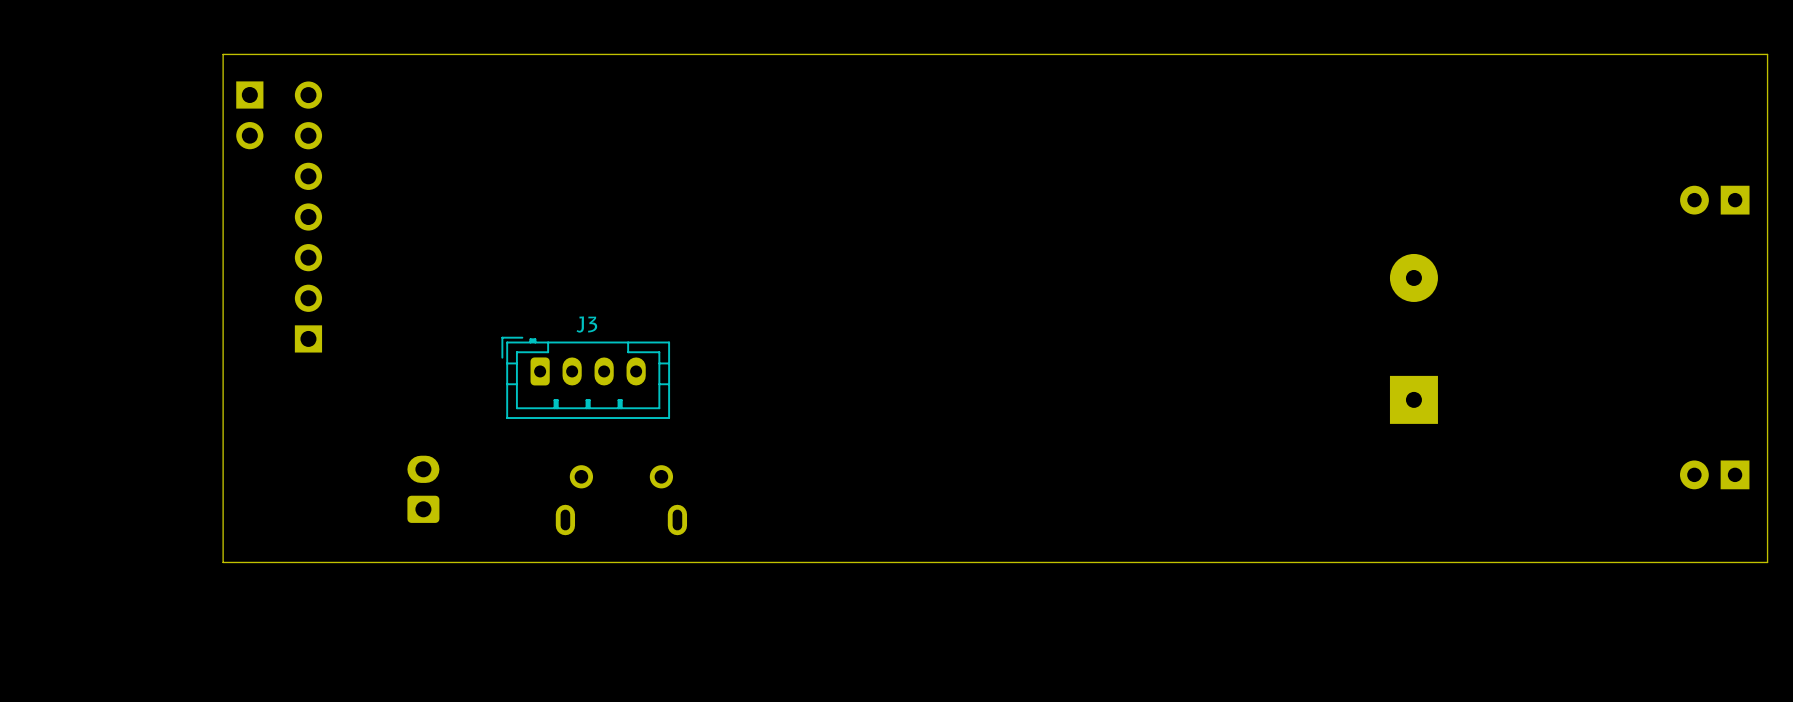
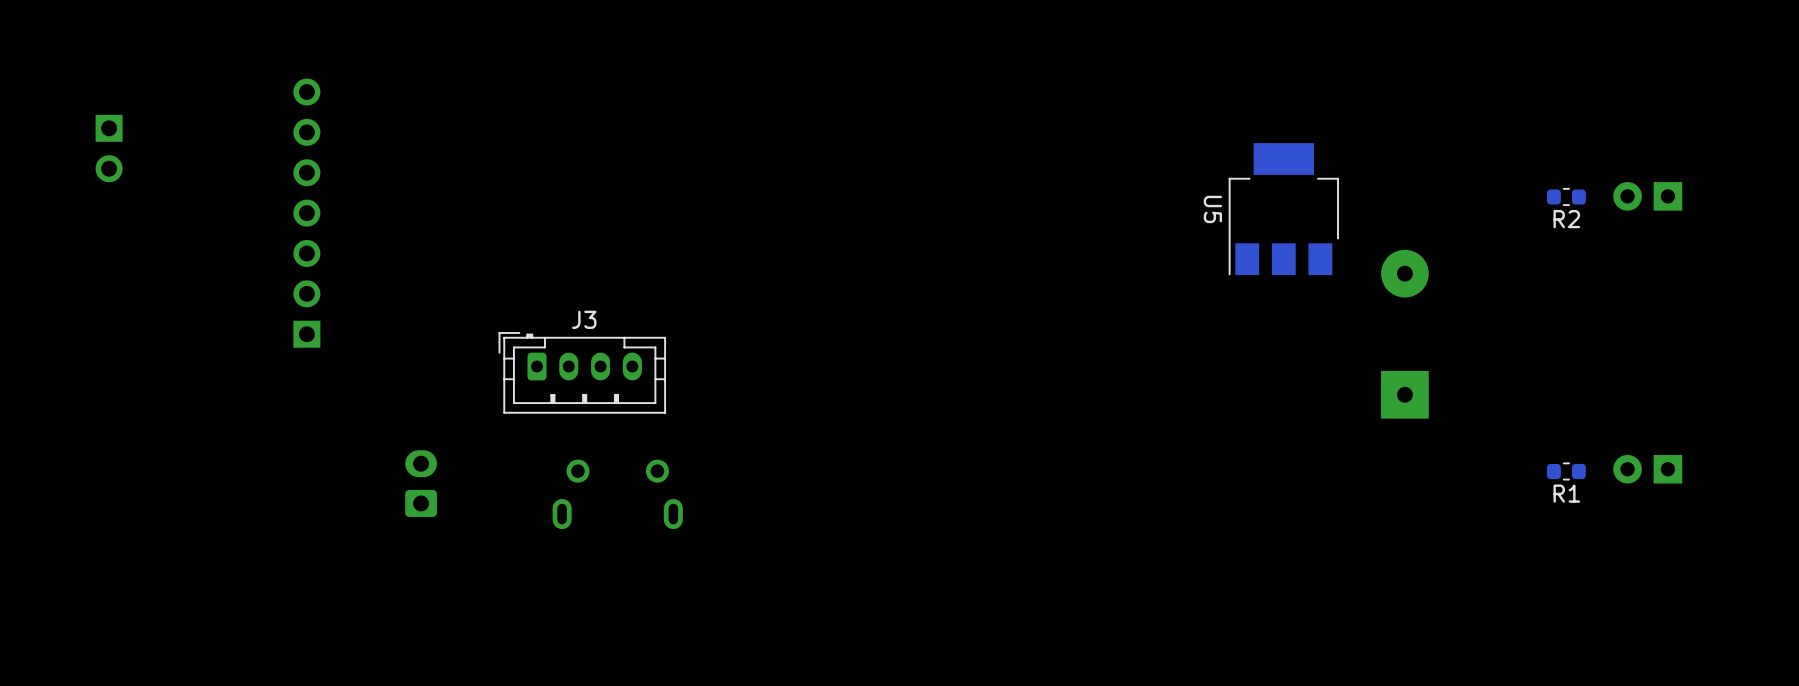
board edge: (1767, 54) (223, 54) (223, 562) (1767, 562) (1767, 54) -> none
part position: (249, 115) -> (109, 148)
R2: none -> (1566, 196)
part position: (1714, 200) -> (1647, 196)
U5: none -> (1283, 209)
part position: (1714, 474) -> (1647, 469)
R1: none -> (1566, 471)

